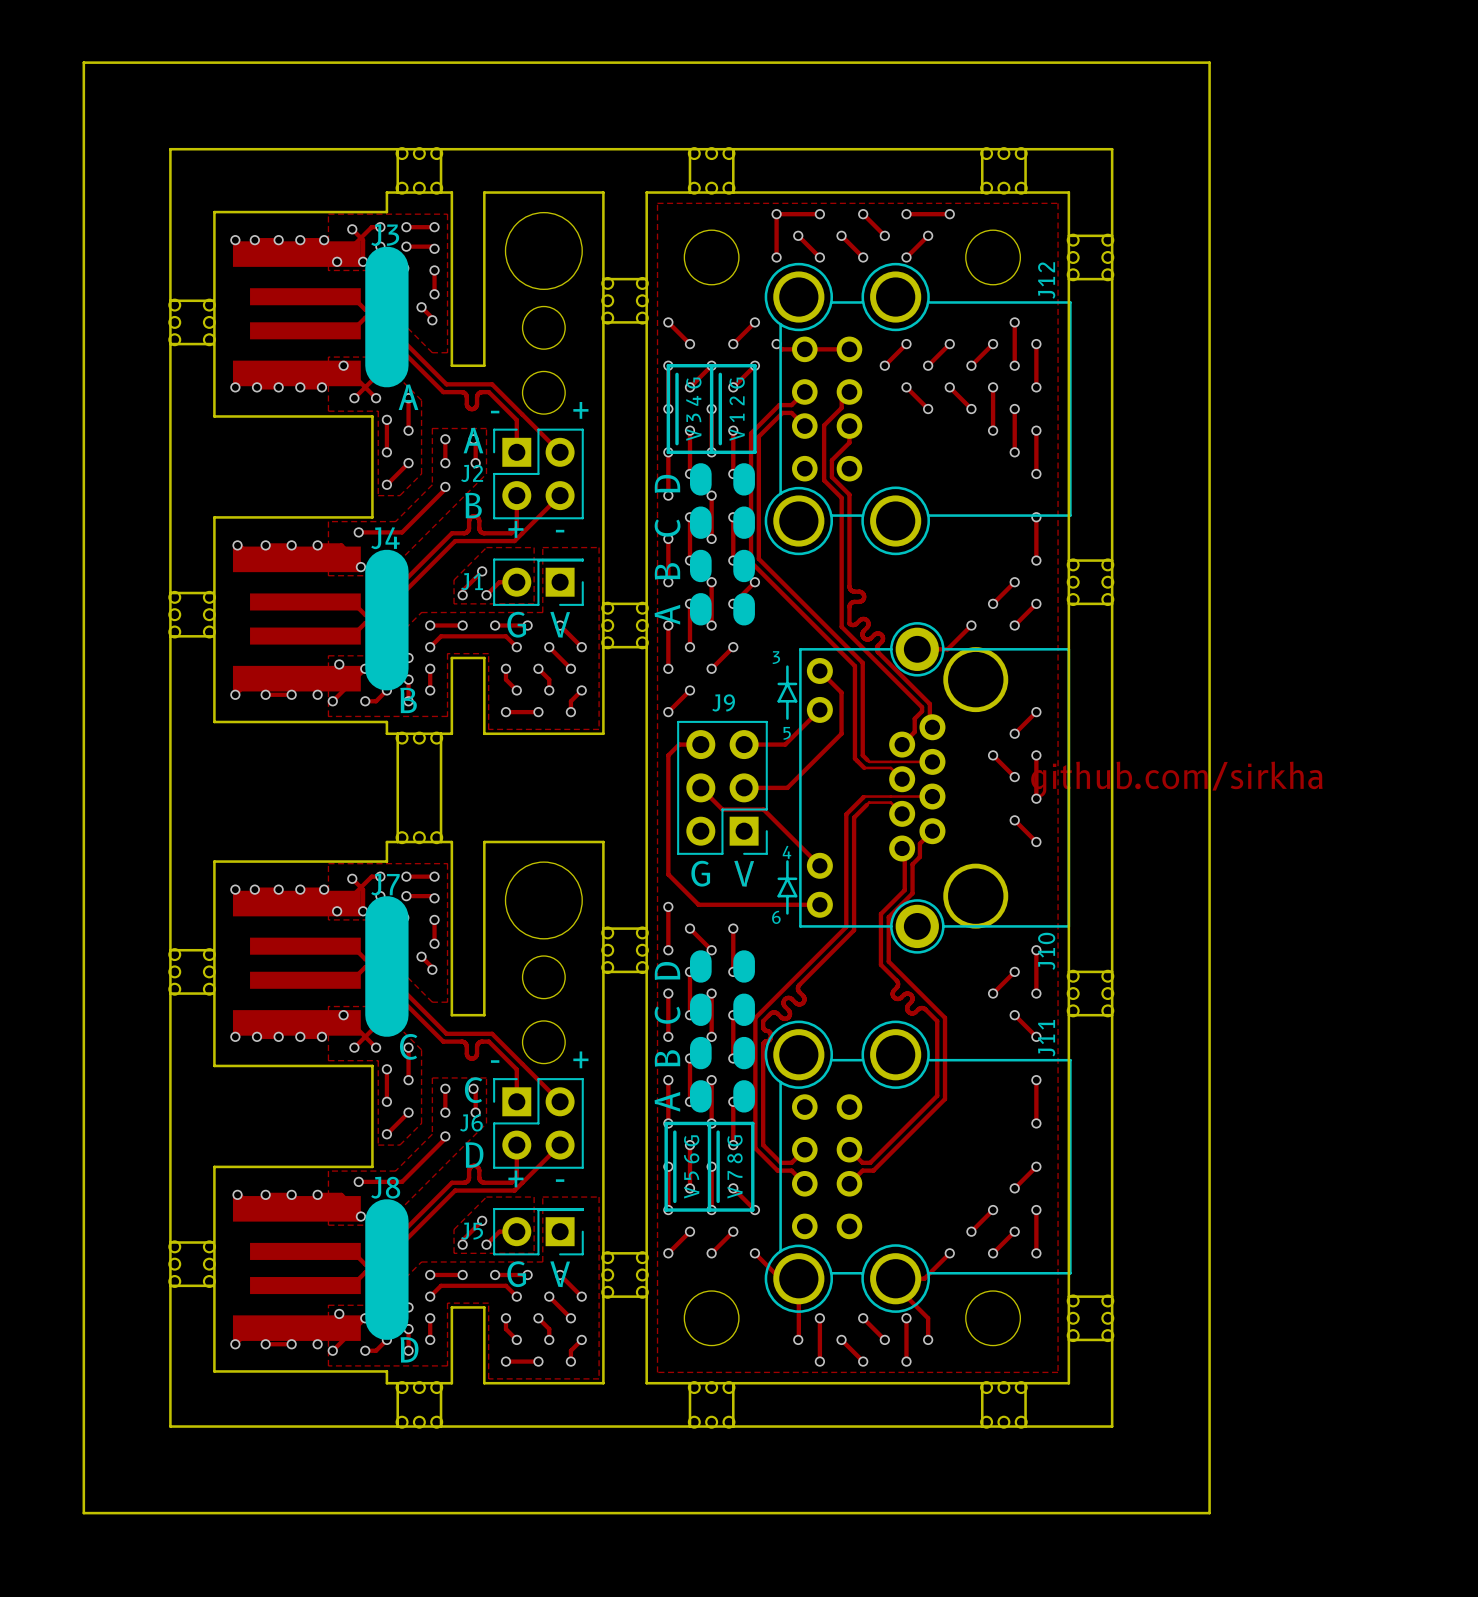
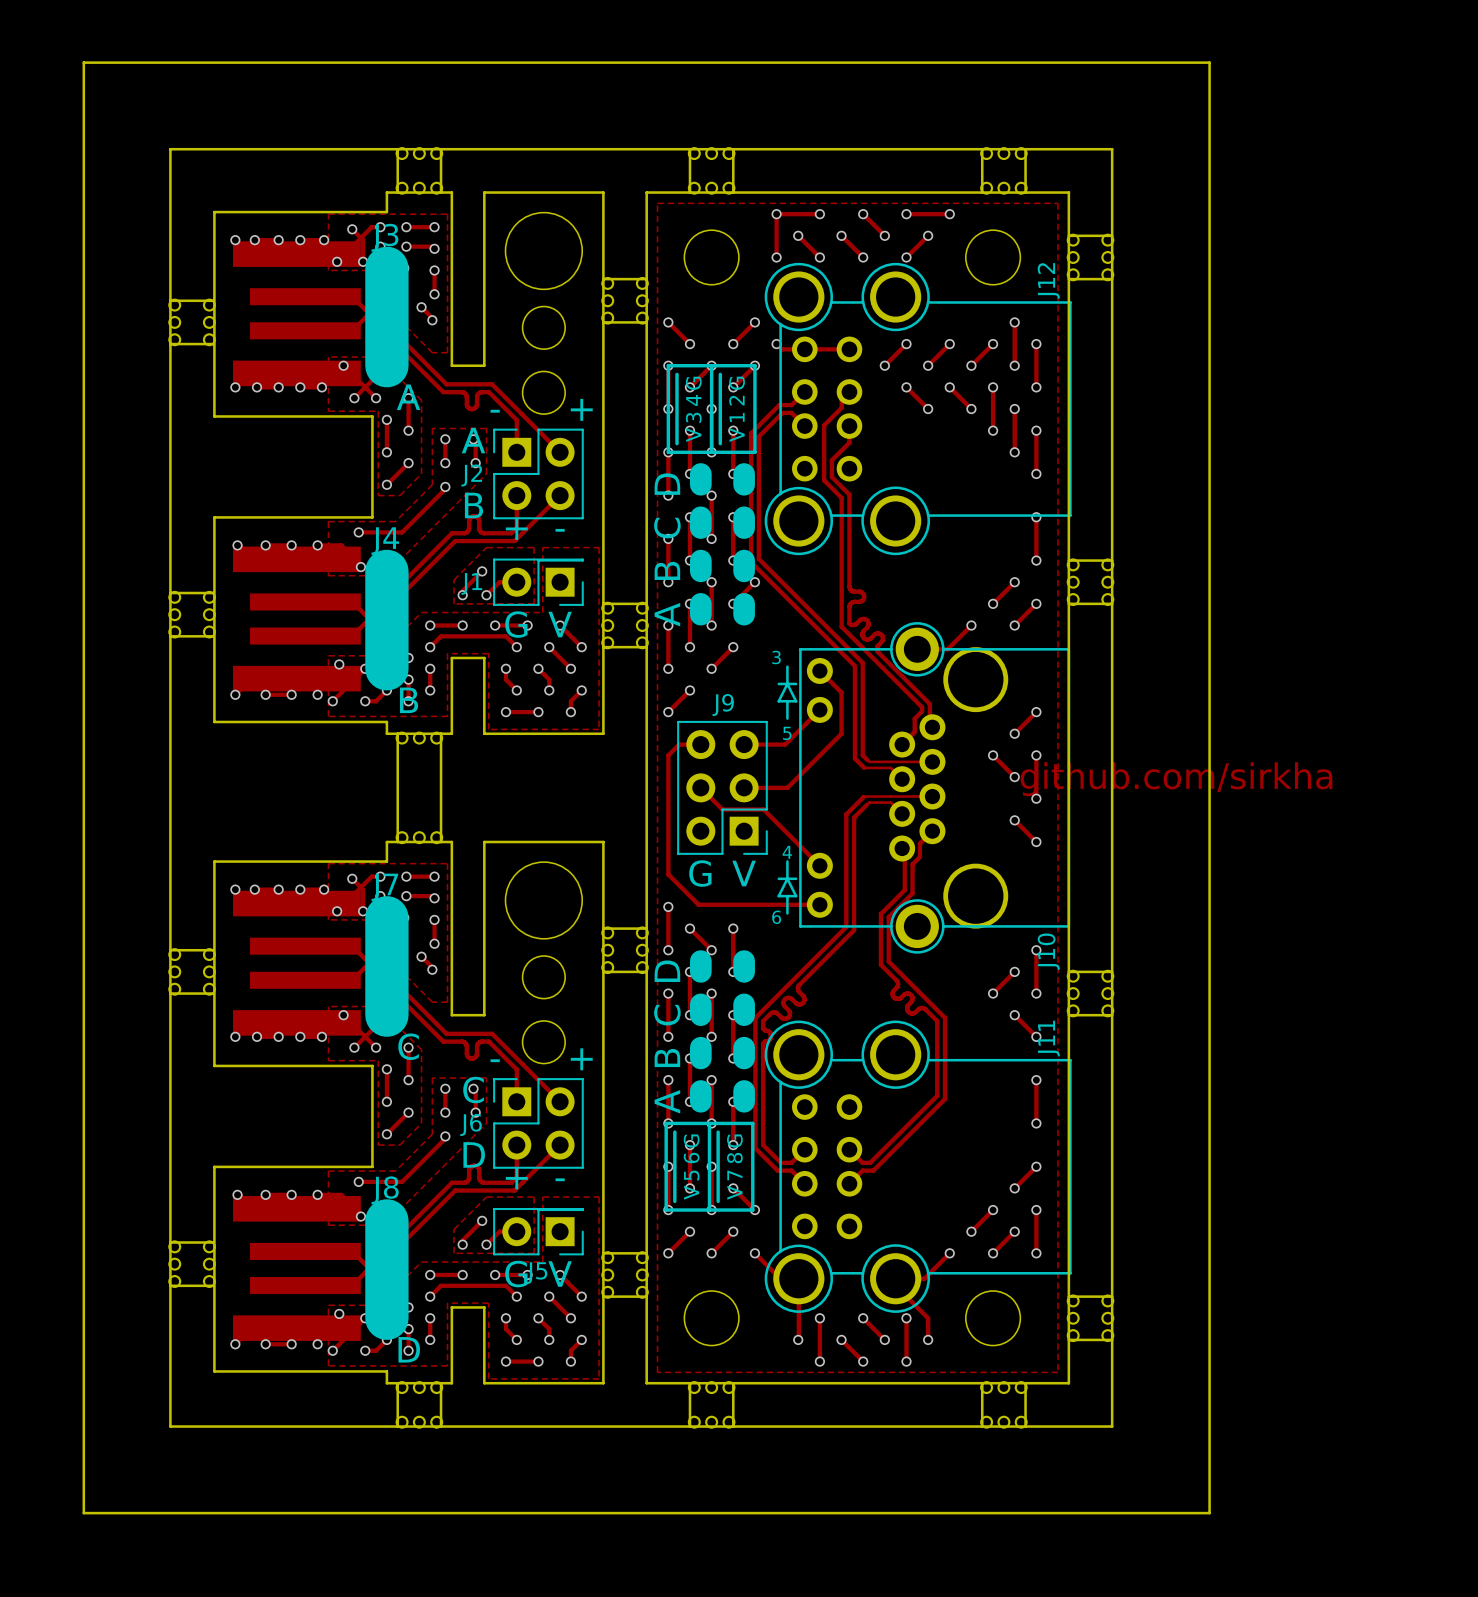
J5 name position: J5 (472, 1231) -> J5 (536, 1273)

